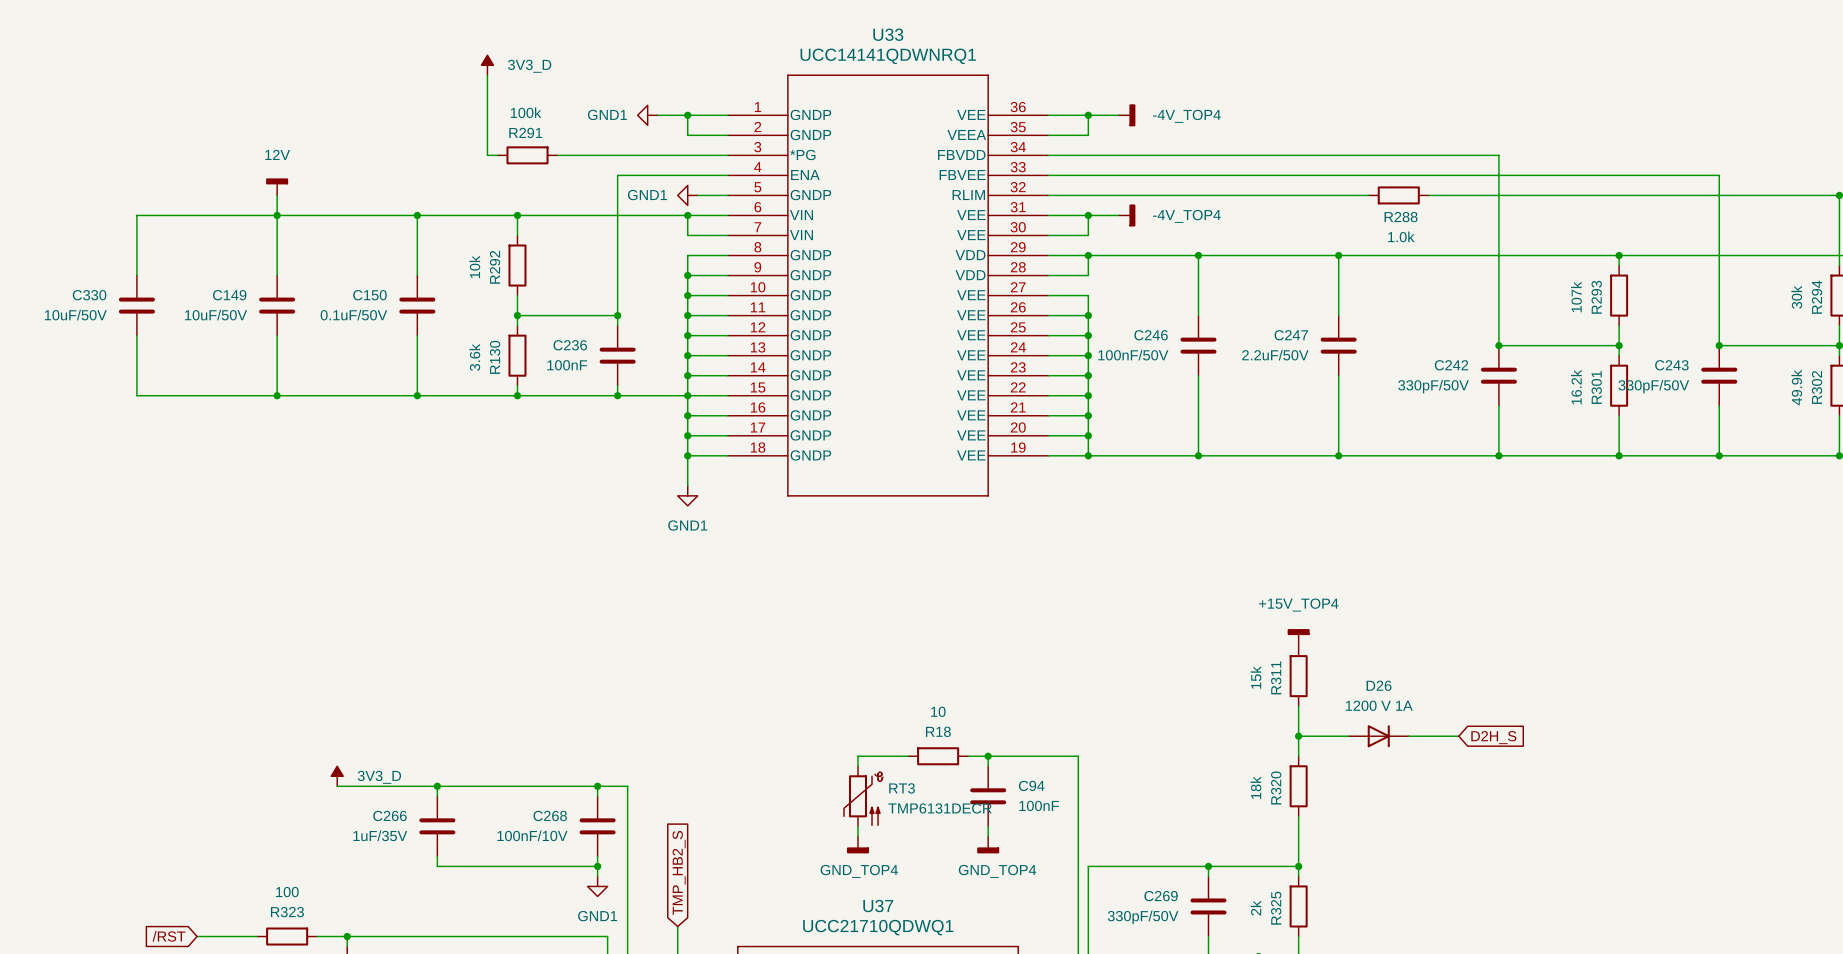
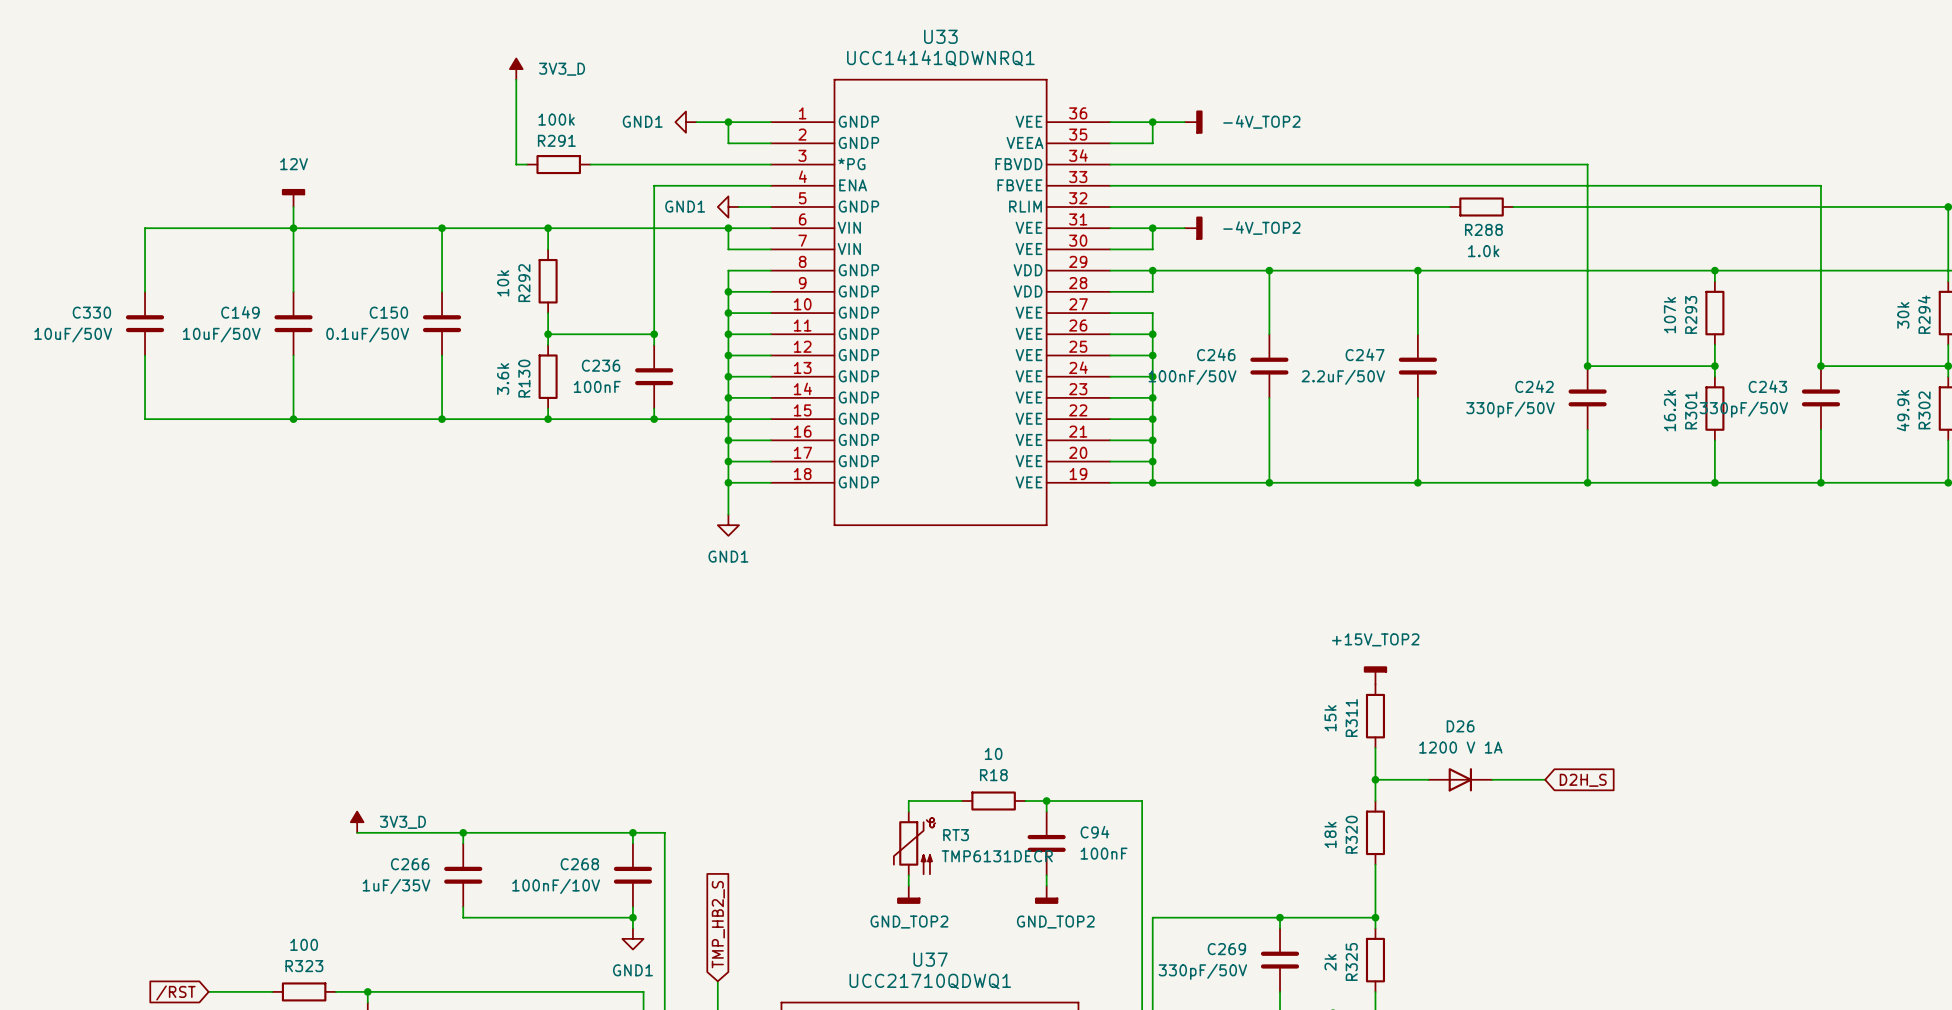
power symbol: -4V_TOP4 (1126, 115) -> -4V_TOP2 (1193, 122)
power symbol: -4V_TOP4 (1126, 215) -> -4V_TOP2 (1193, 228)
power symbol: +15V_TOP4 (1298, 637) -> +15V_TOP2 (1375, 675)
power symbol: GND_TOP4 (857, 844) -> GND_TOP2 (908, 894)
power symbol: GND_TOP4 (988, 844) -> GND_TOP2 (1046, 894)

